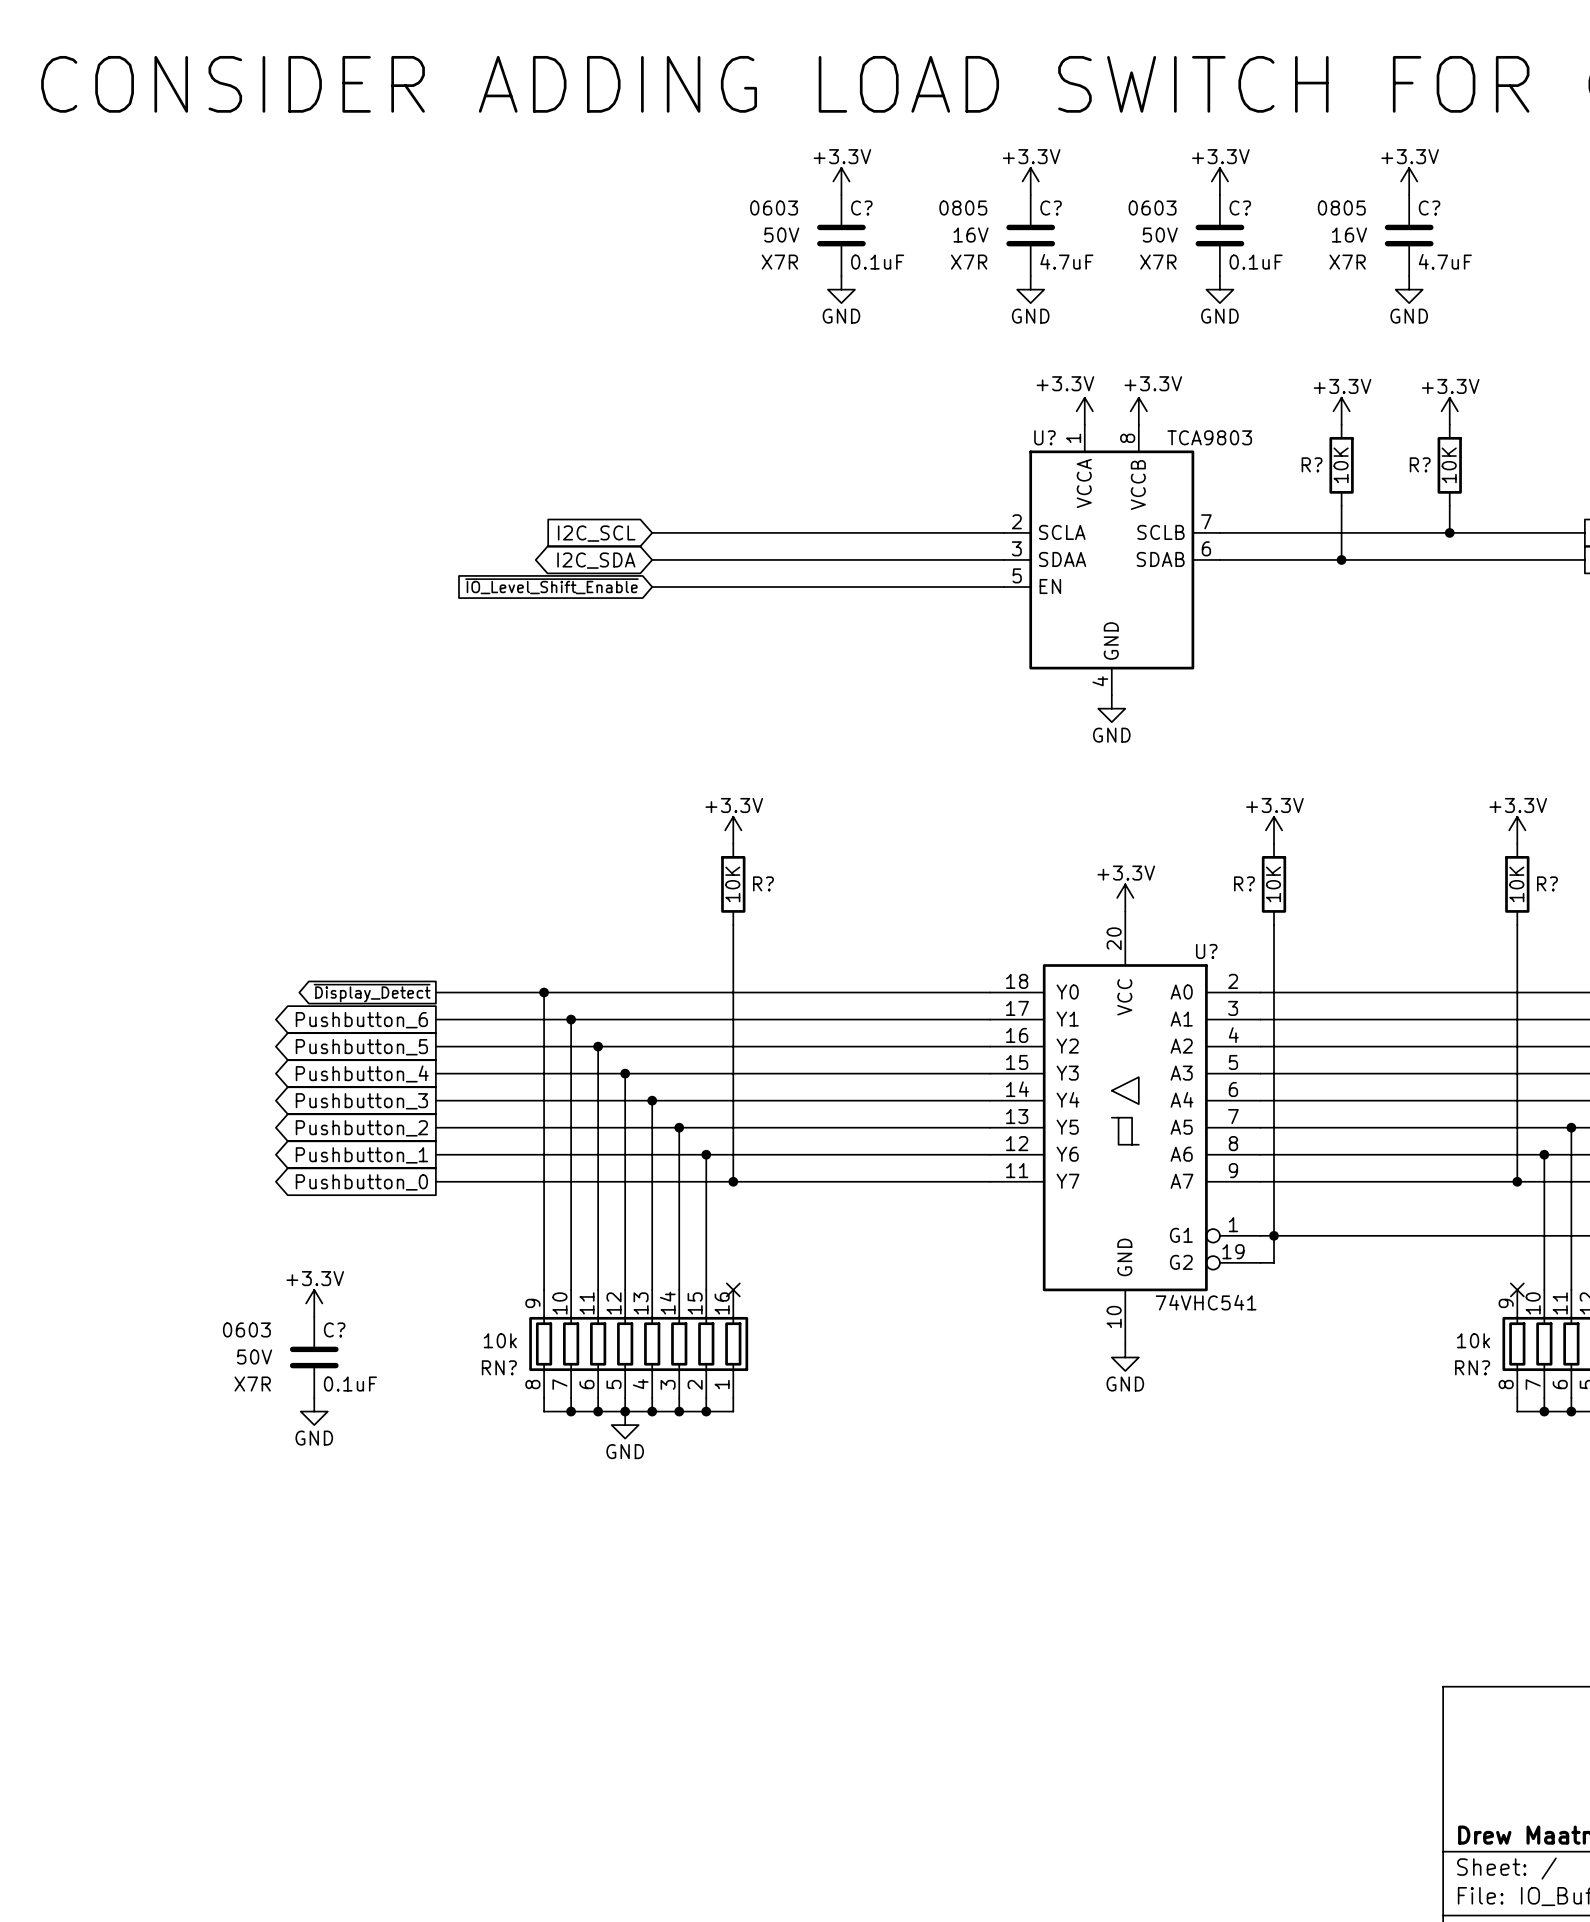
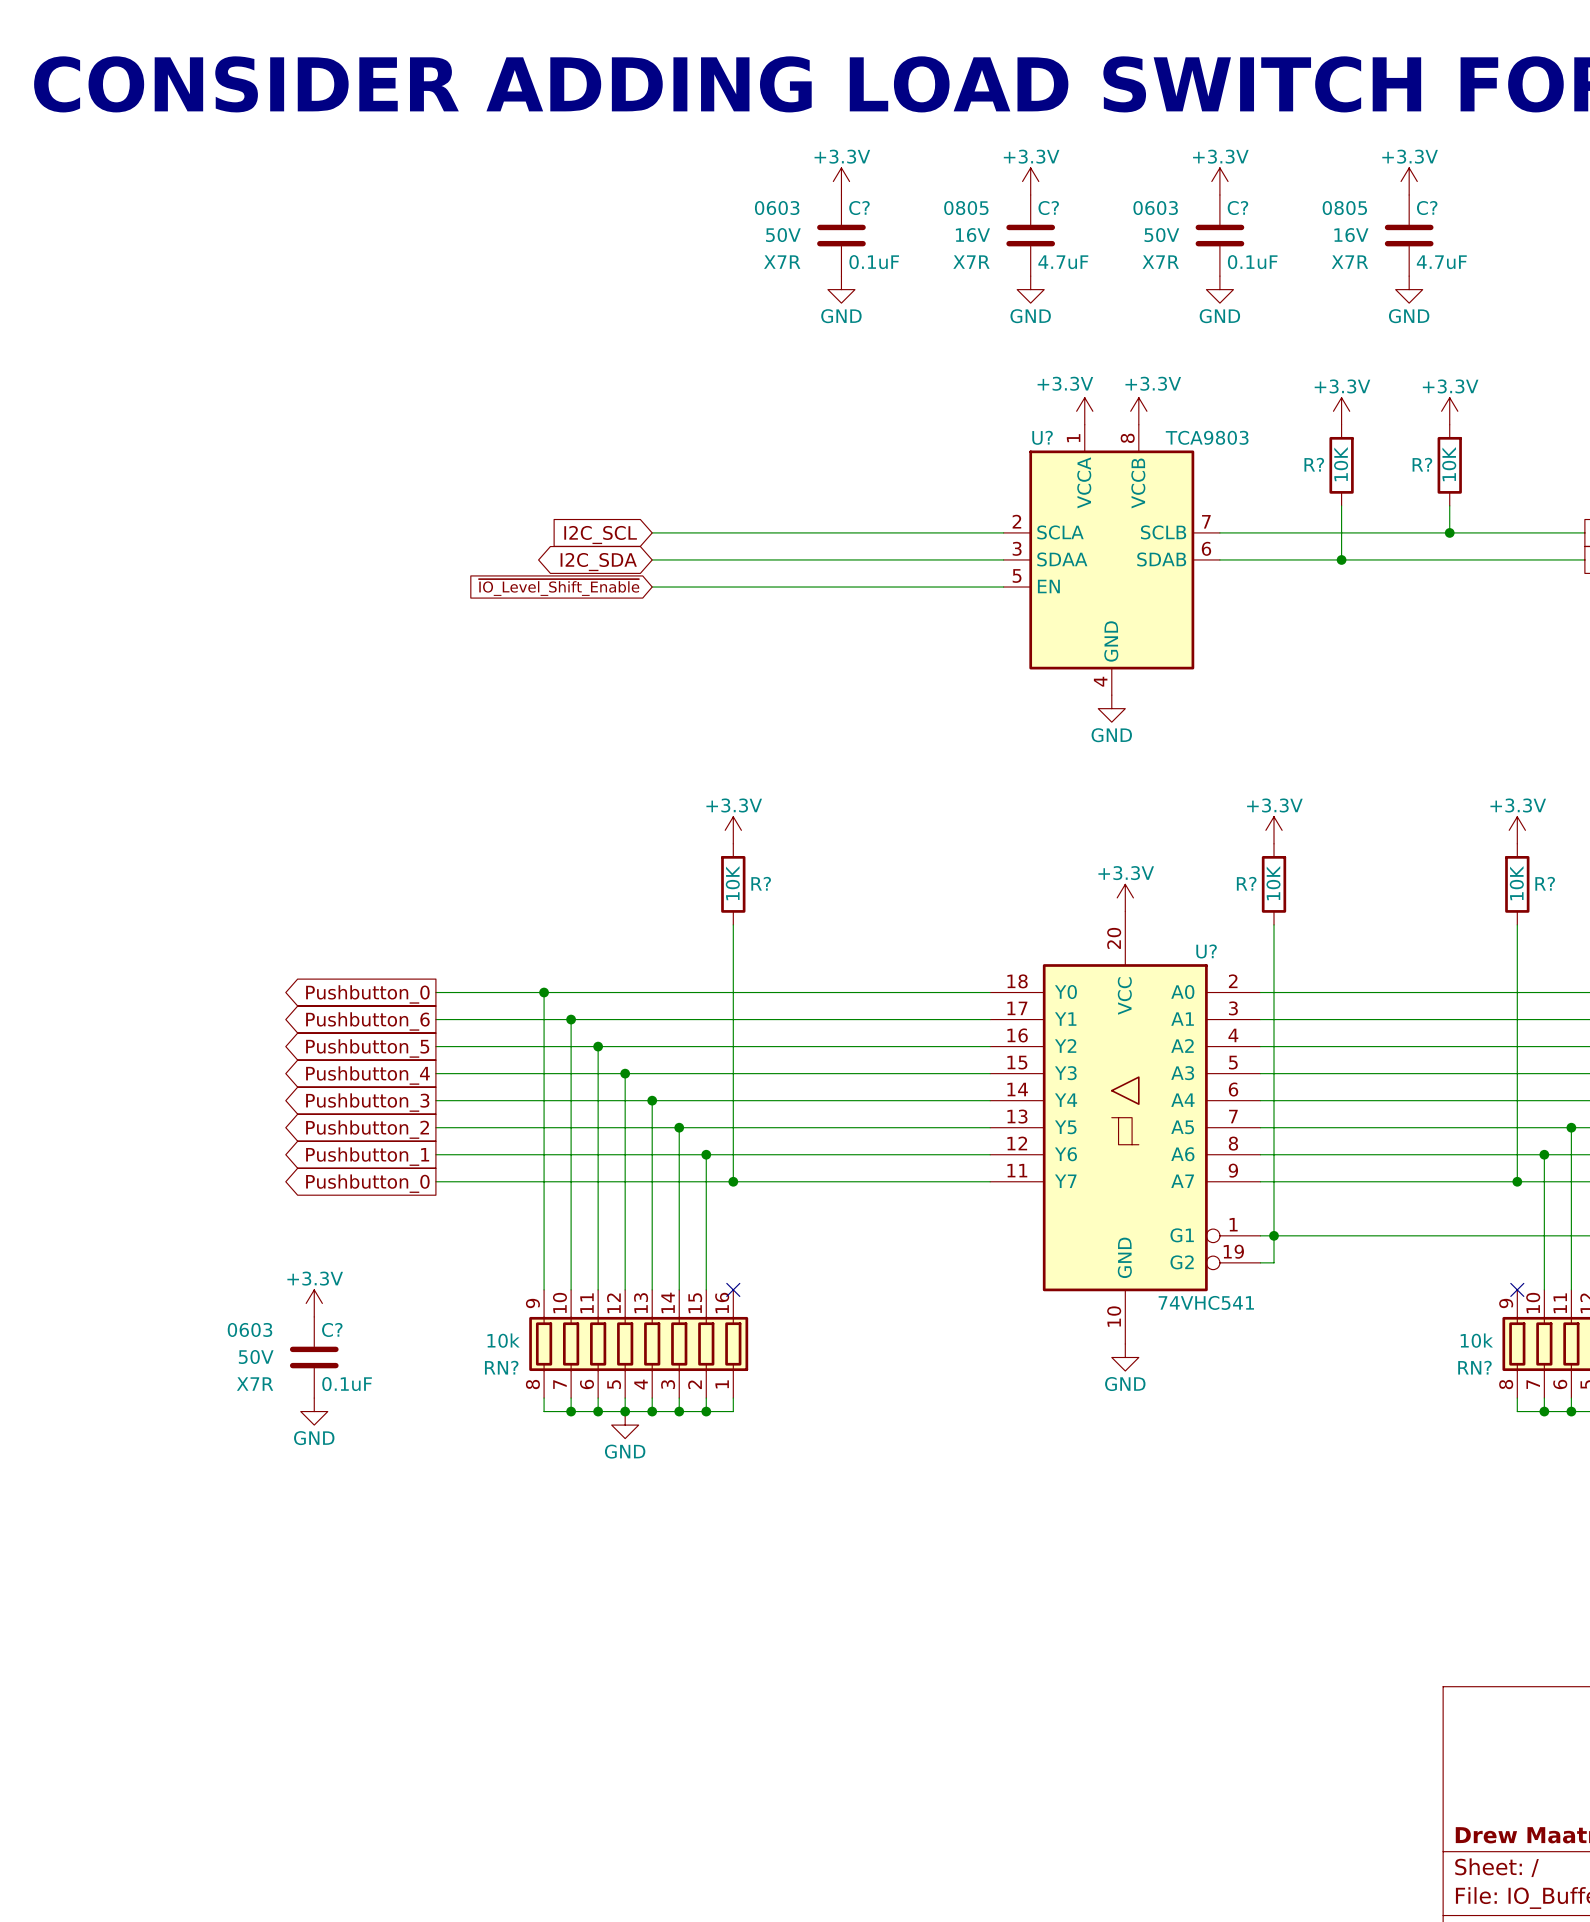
global label: ~{Display_Detect} (372, 993) -> Pushbutton_0 (367, 994)

